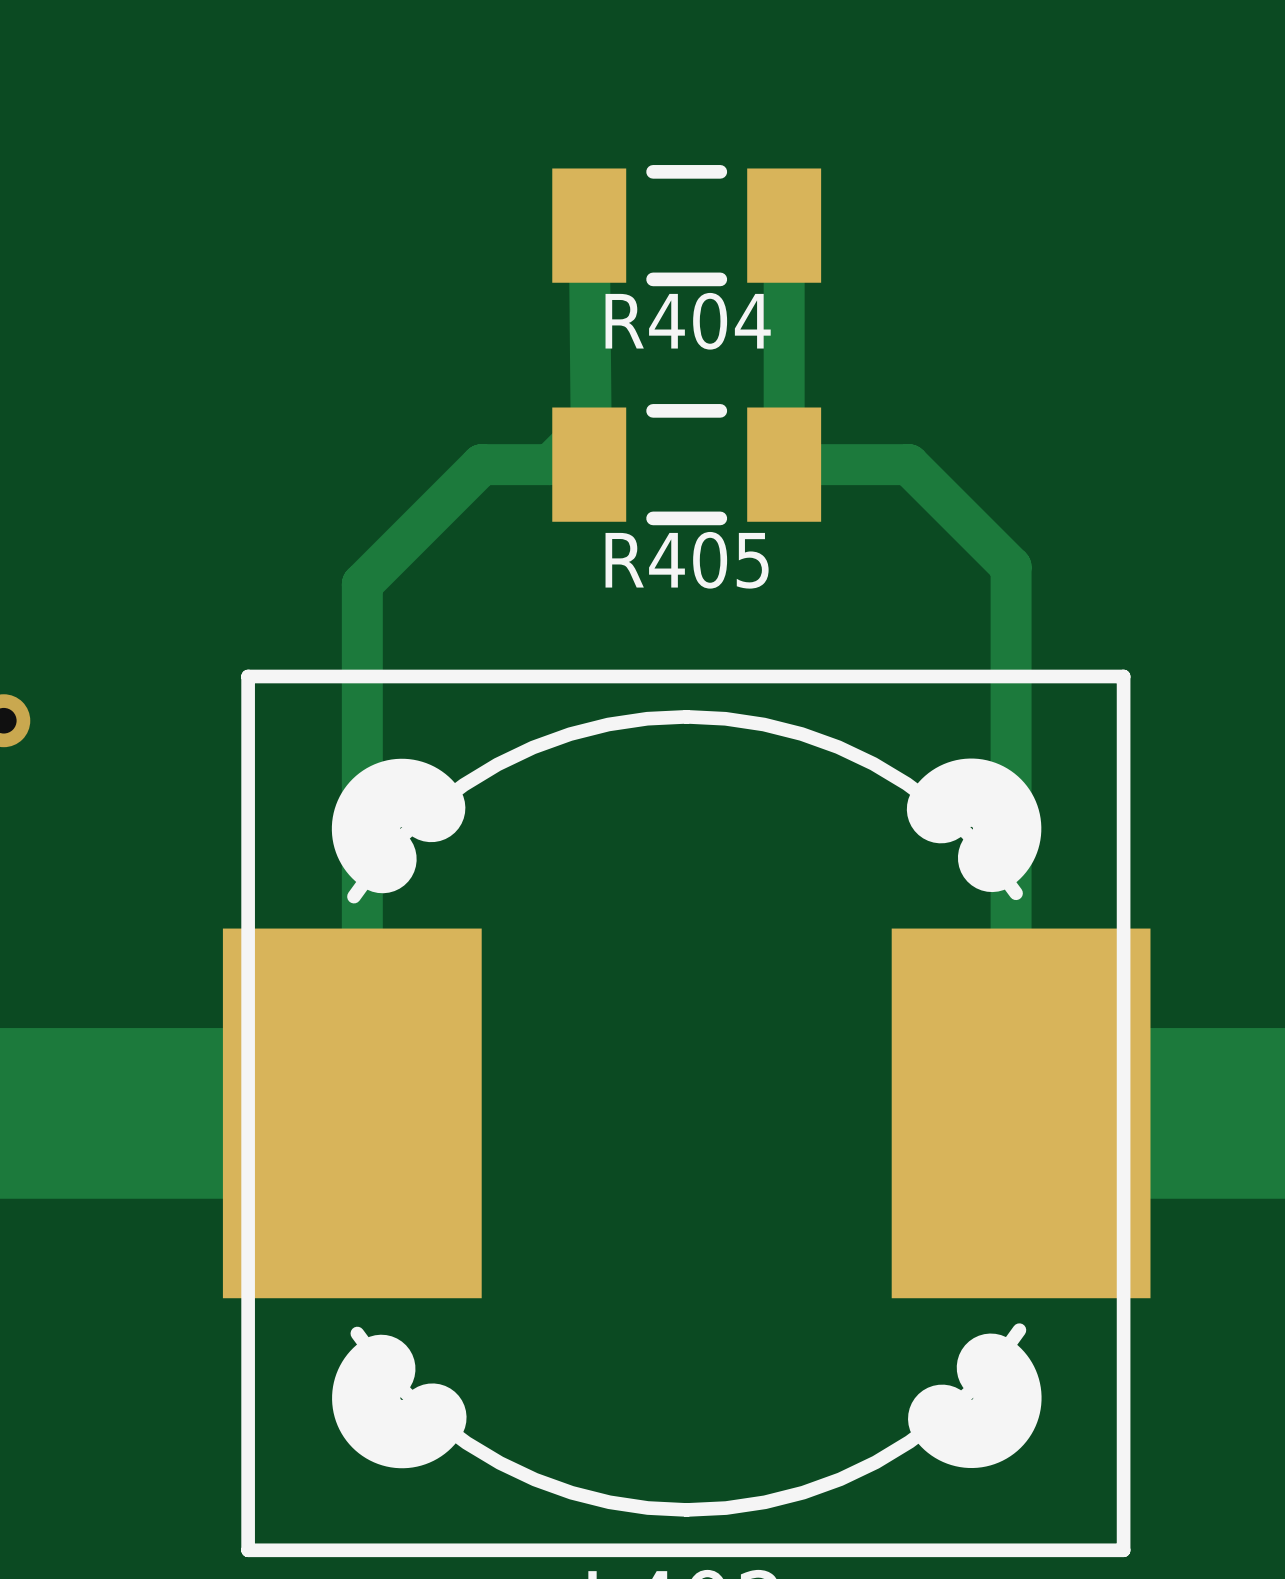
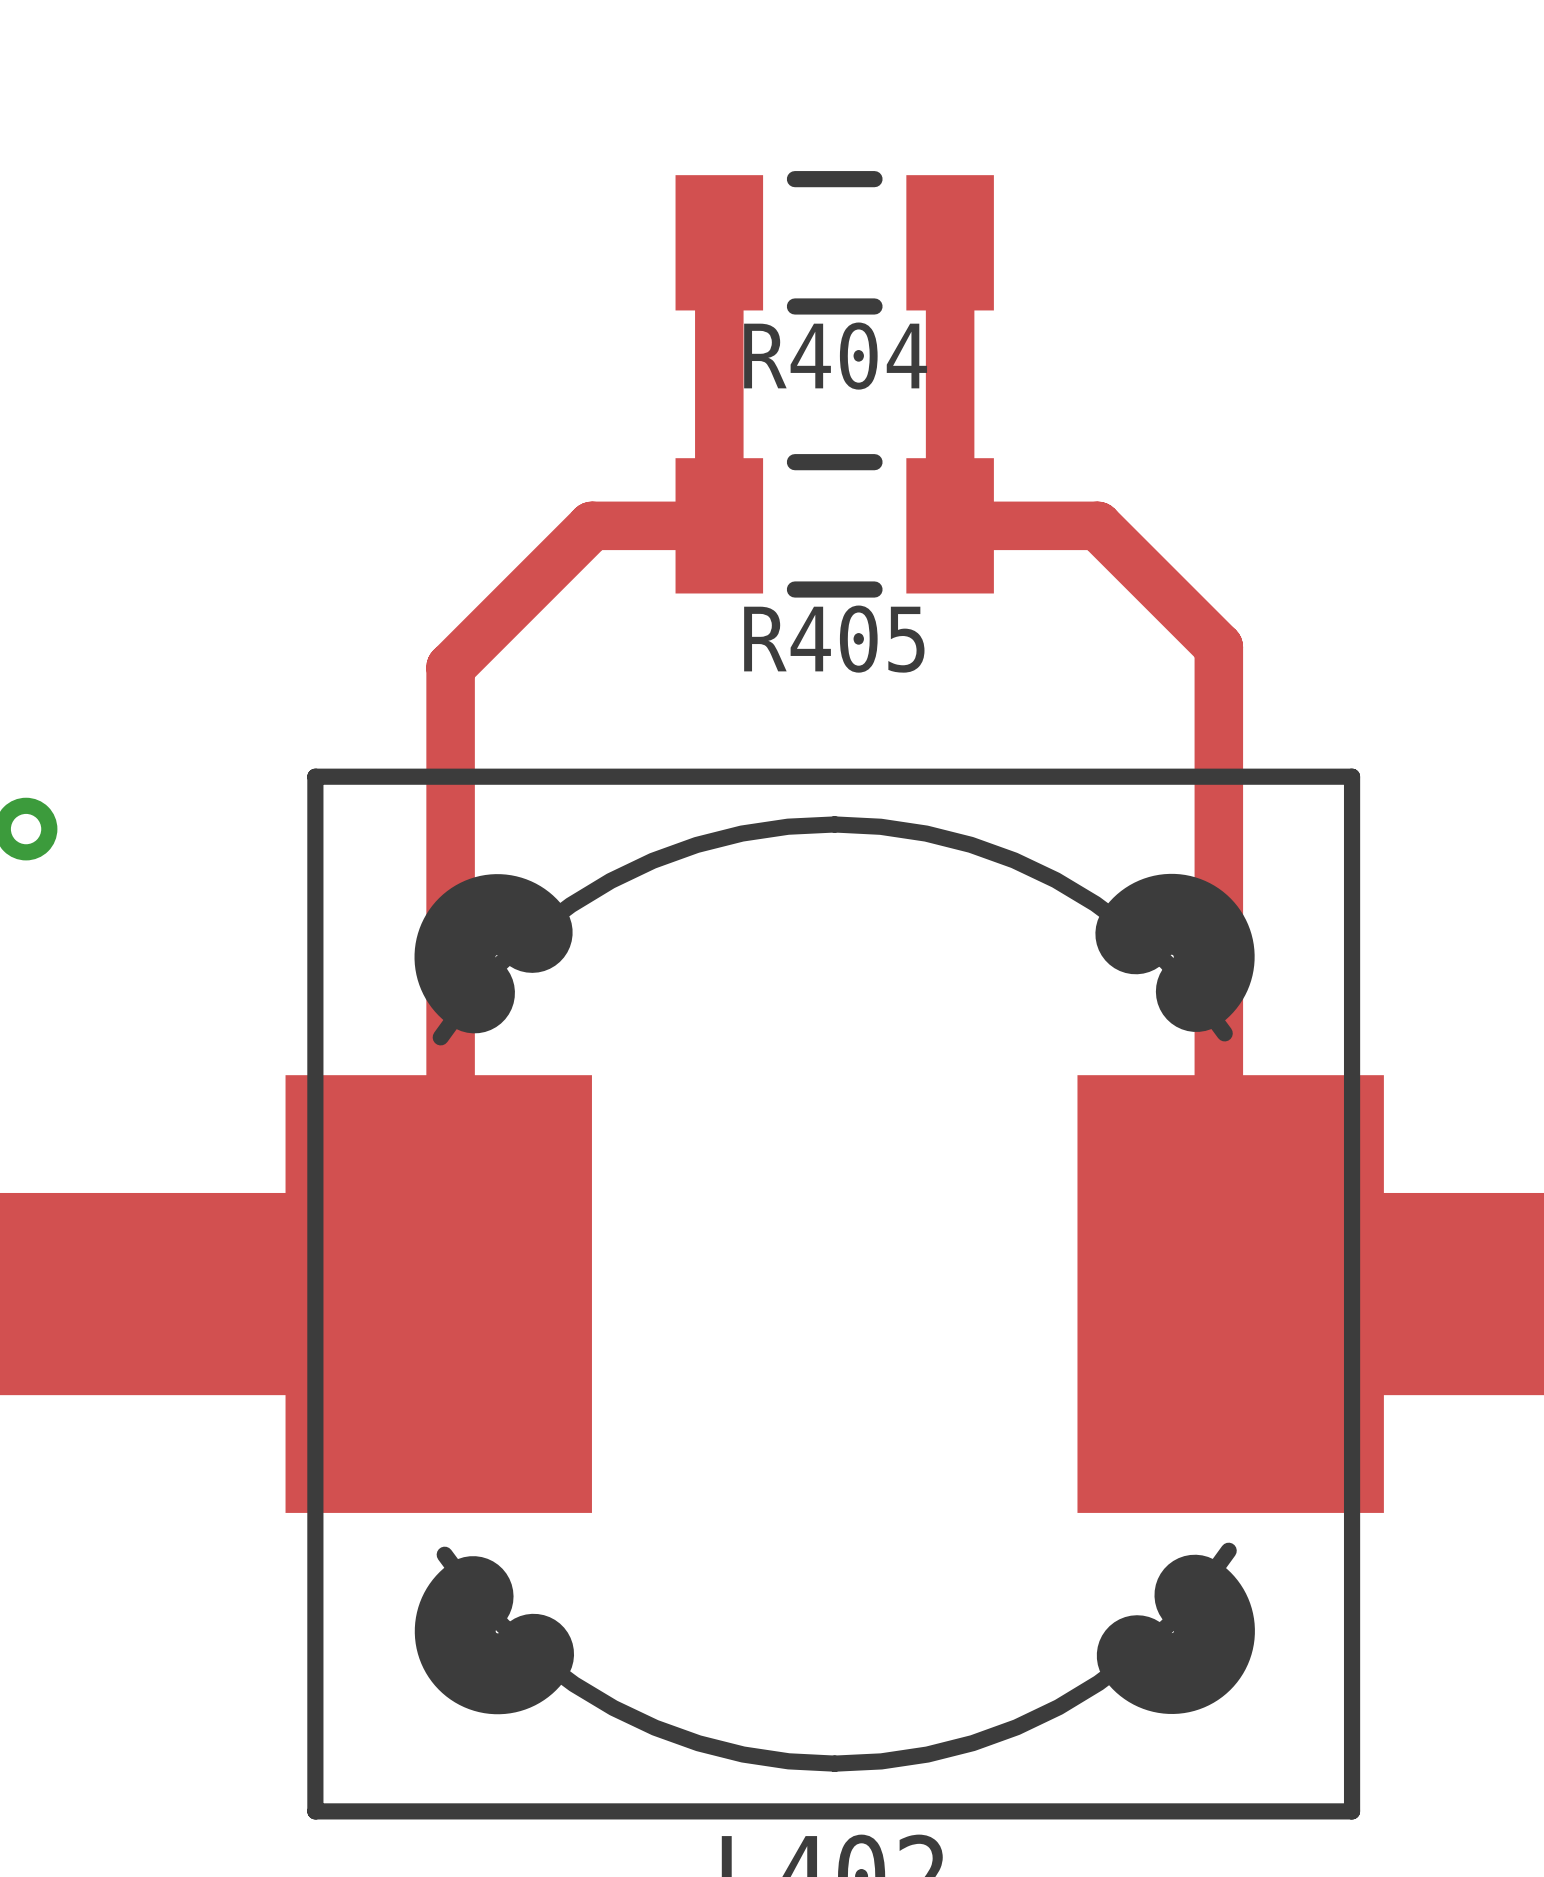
track: (589, 225) (591, 423) (550, 464) -> (719, 242) (719, 525) (723, 525)

